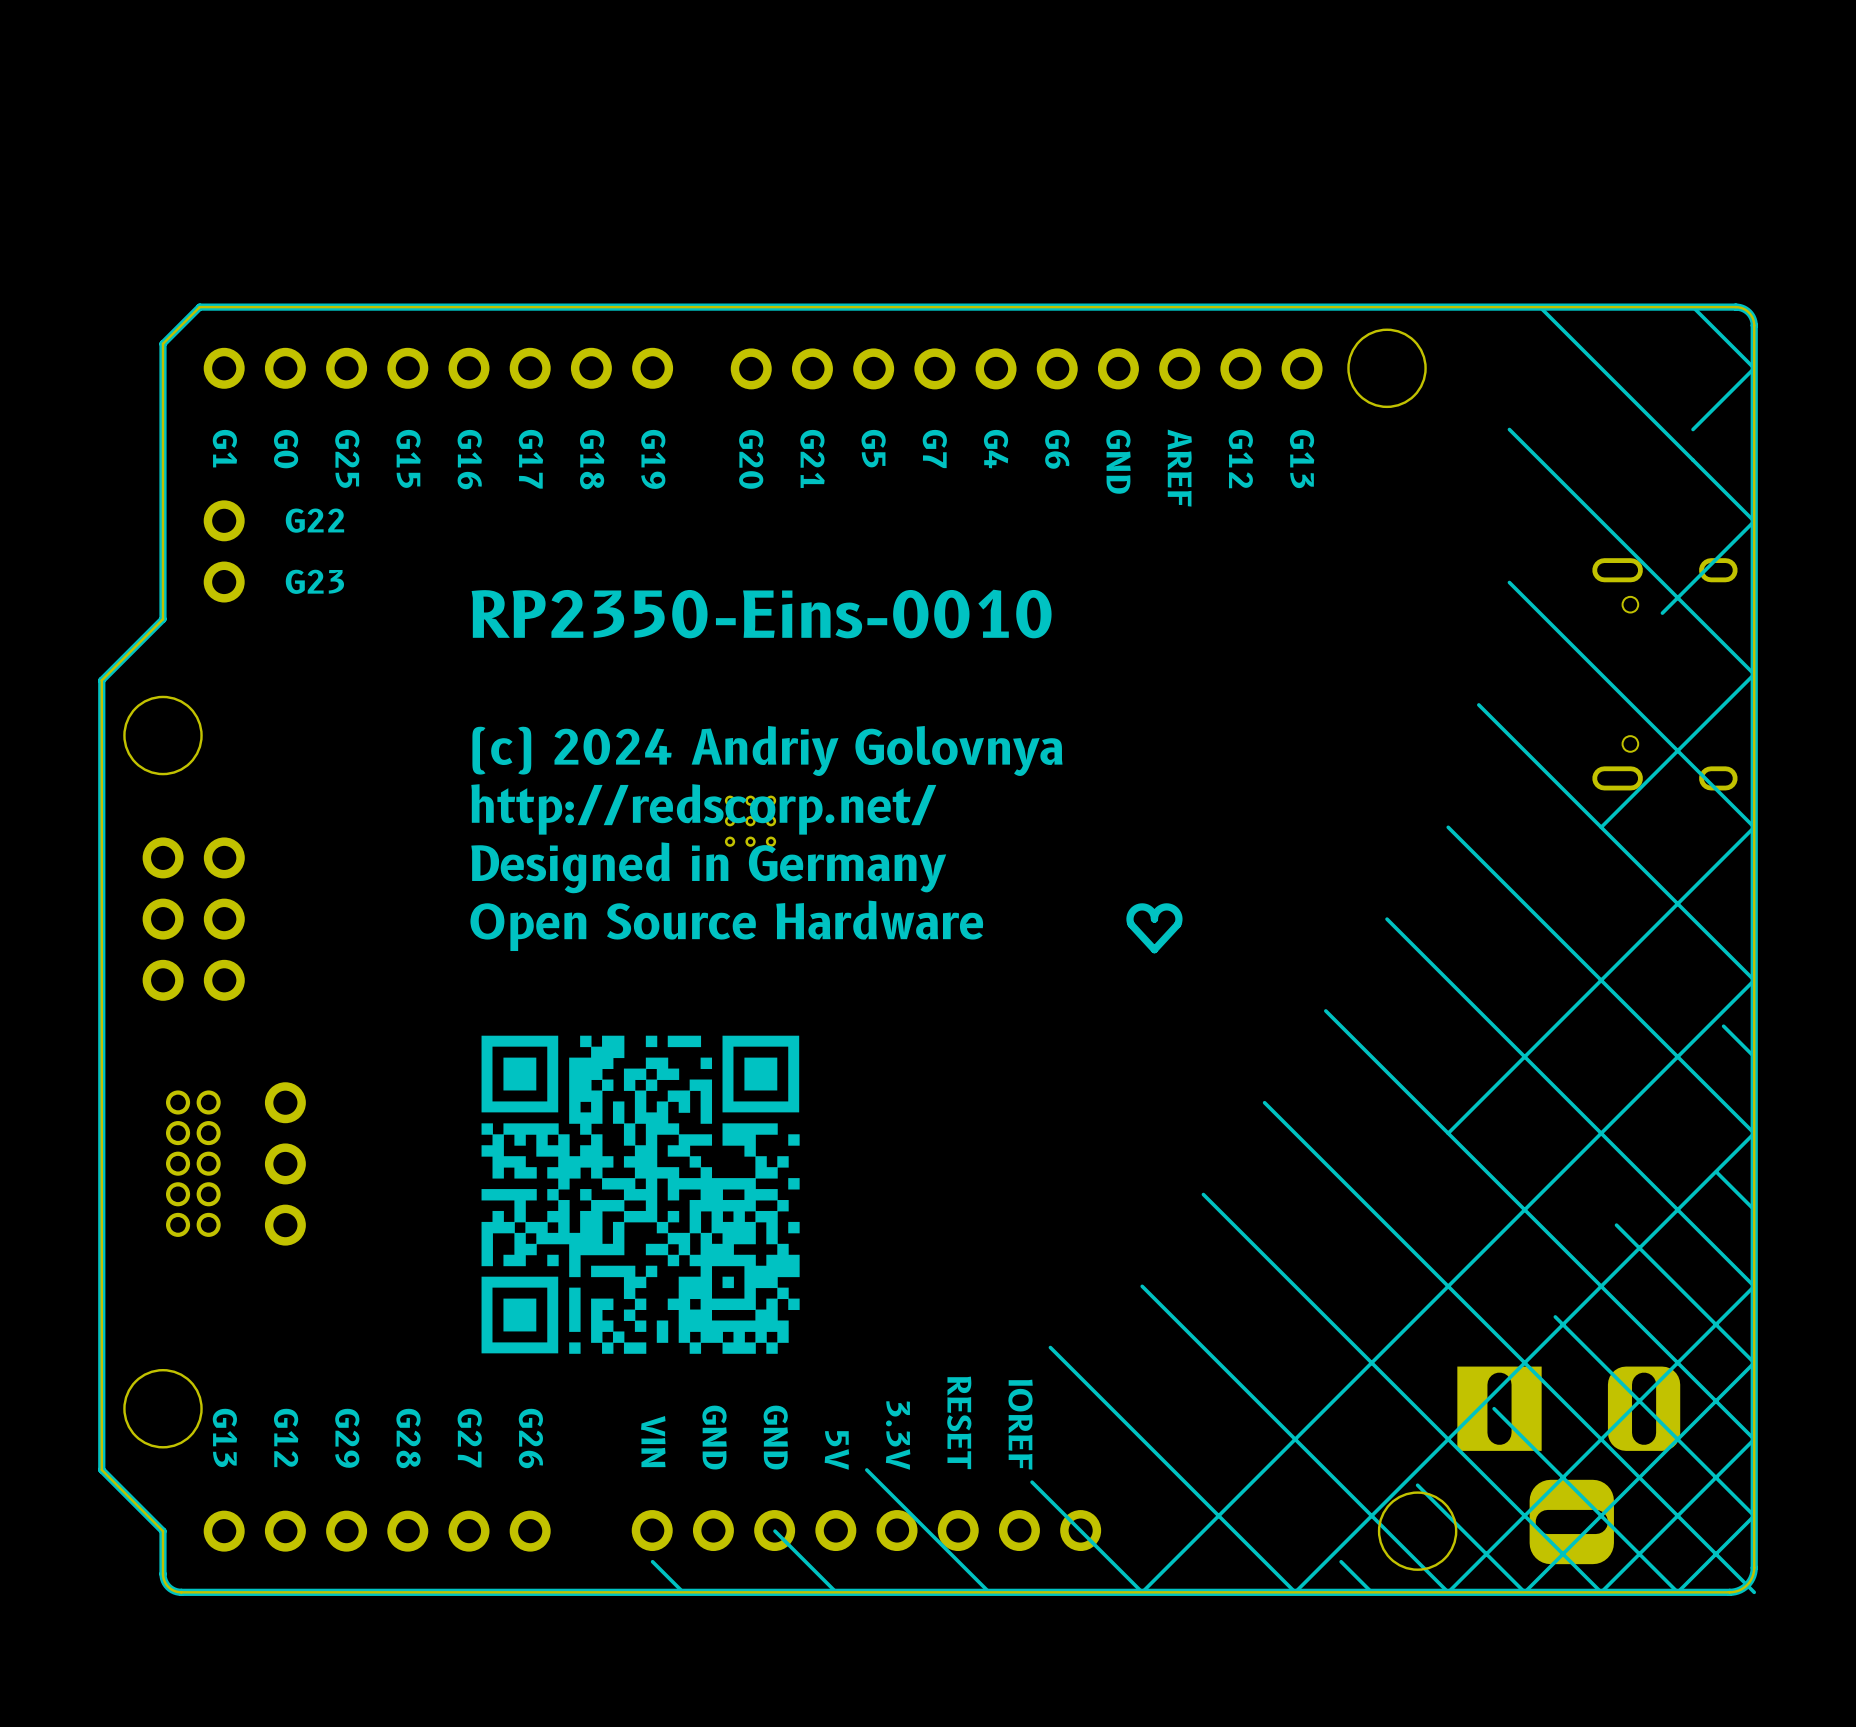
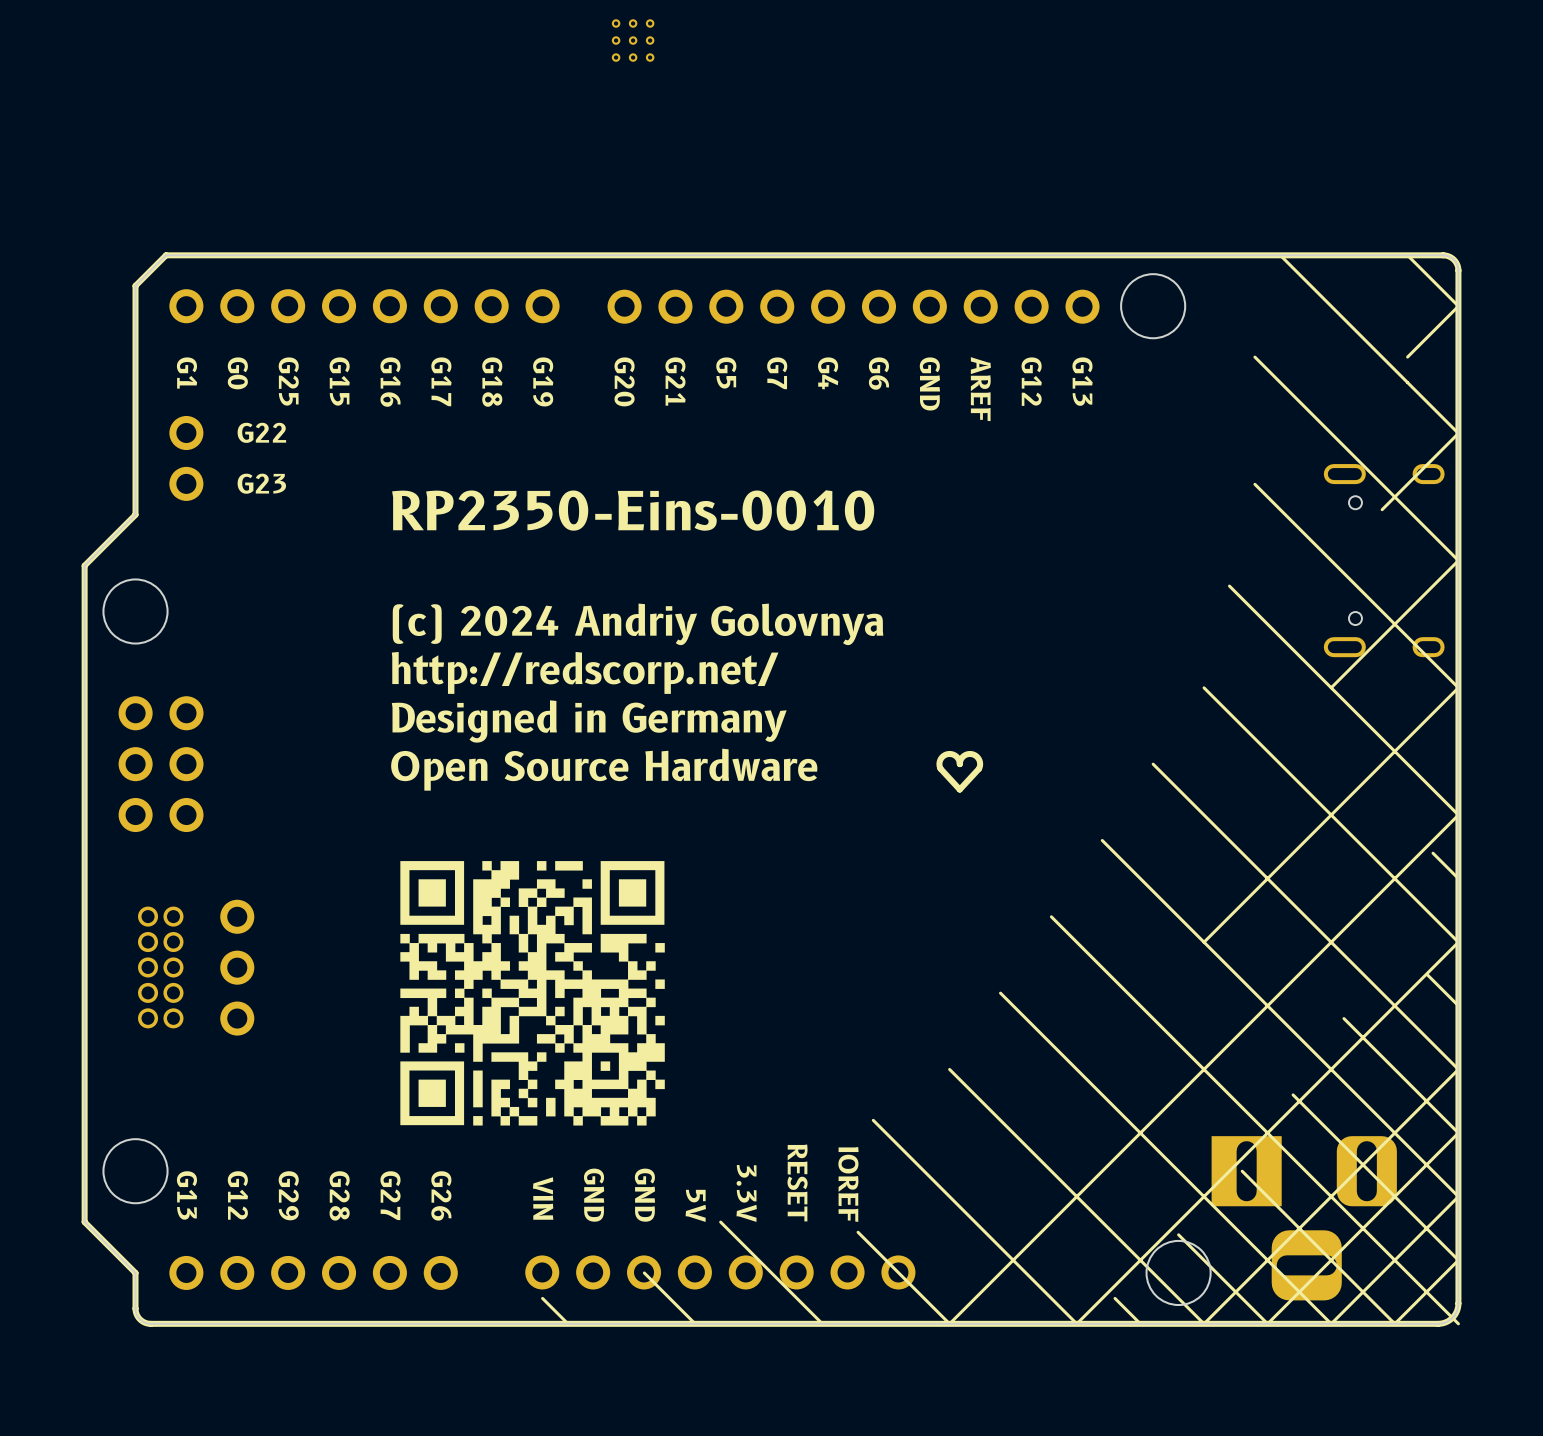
part: none -> (633, 40)
part: (750, 821) -> none

